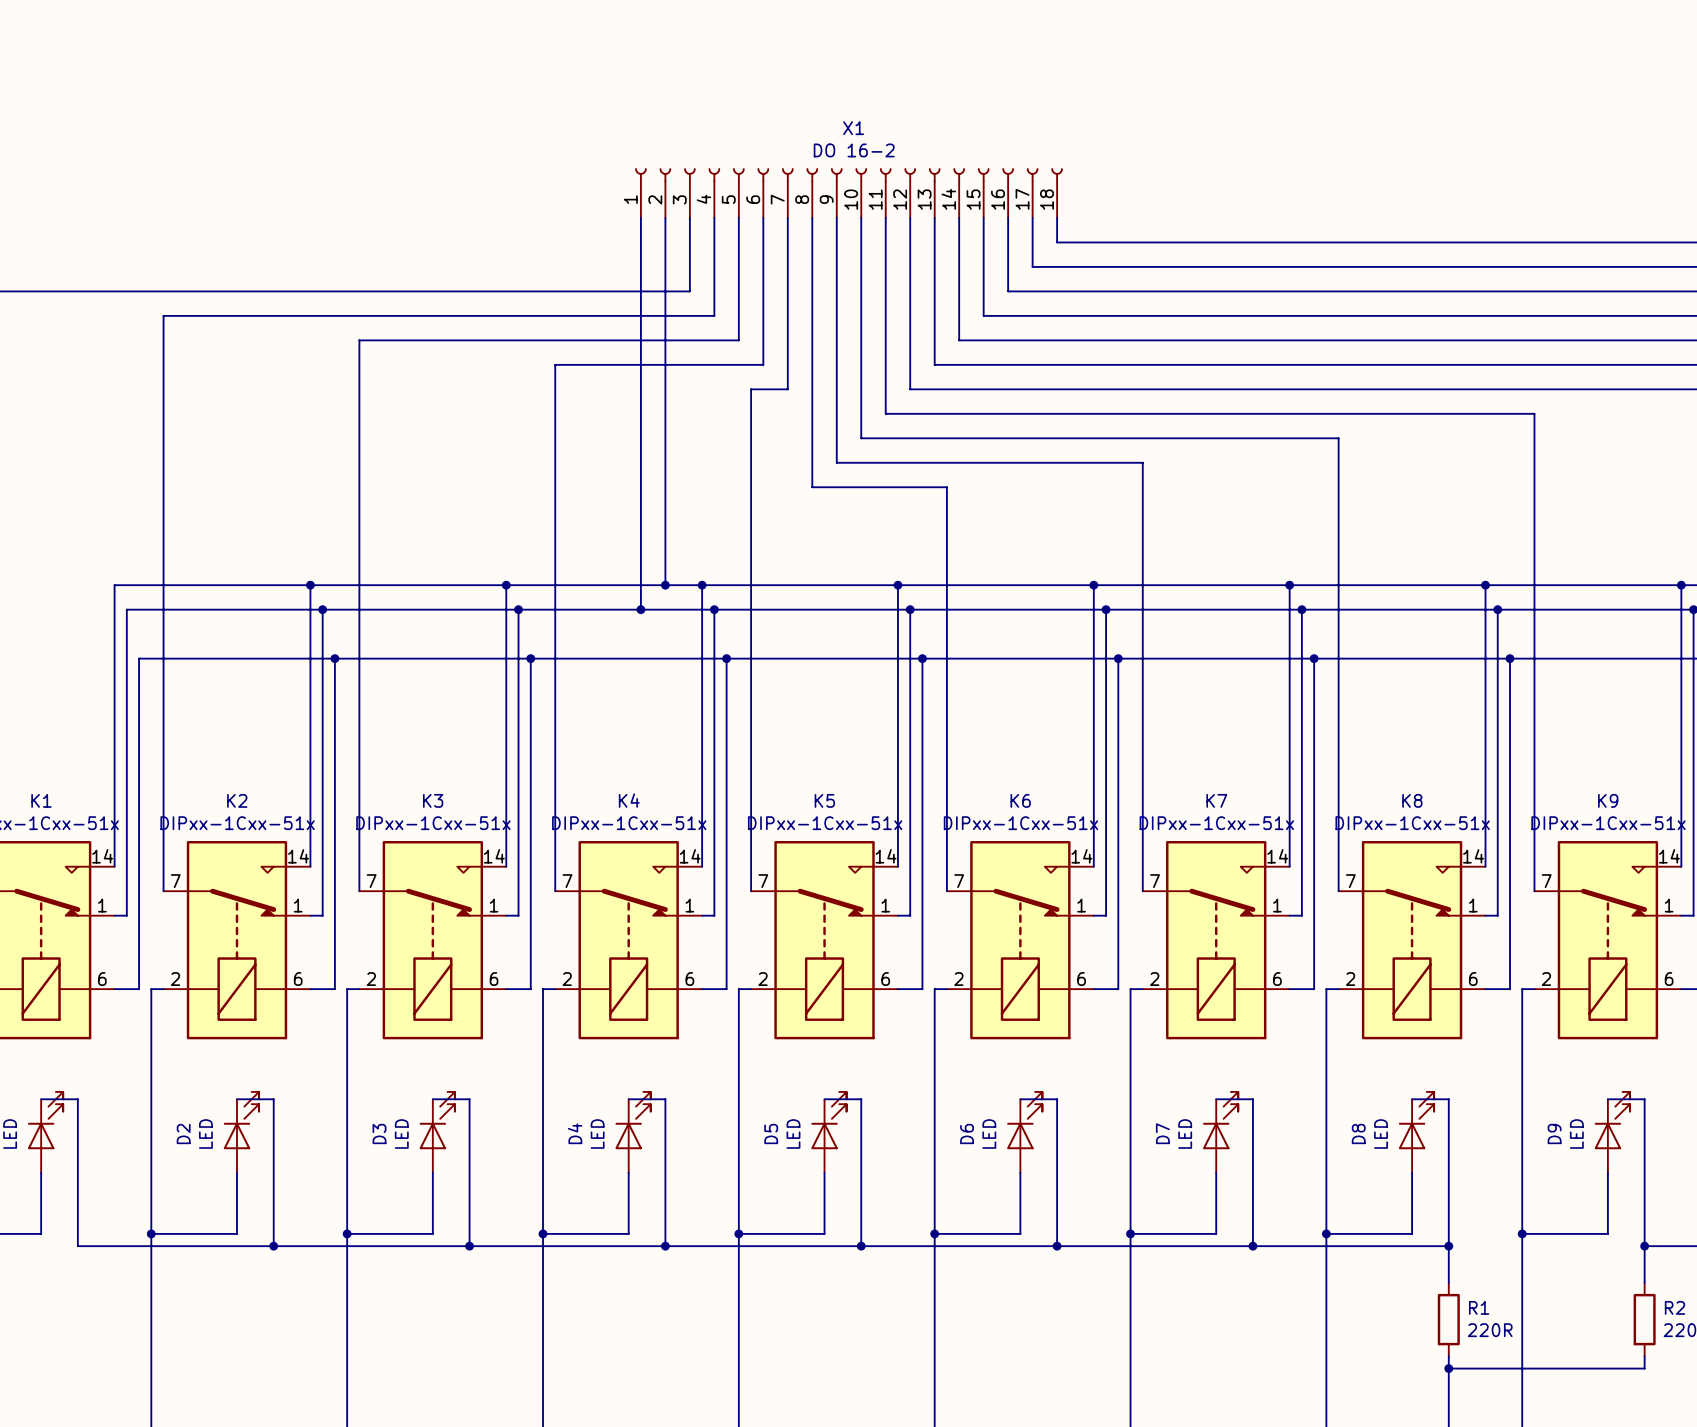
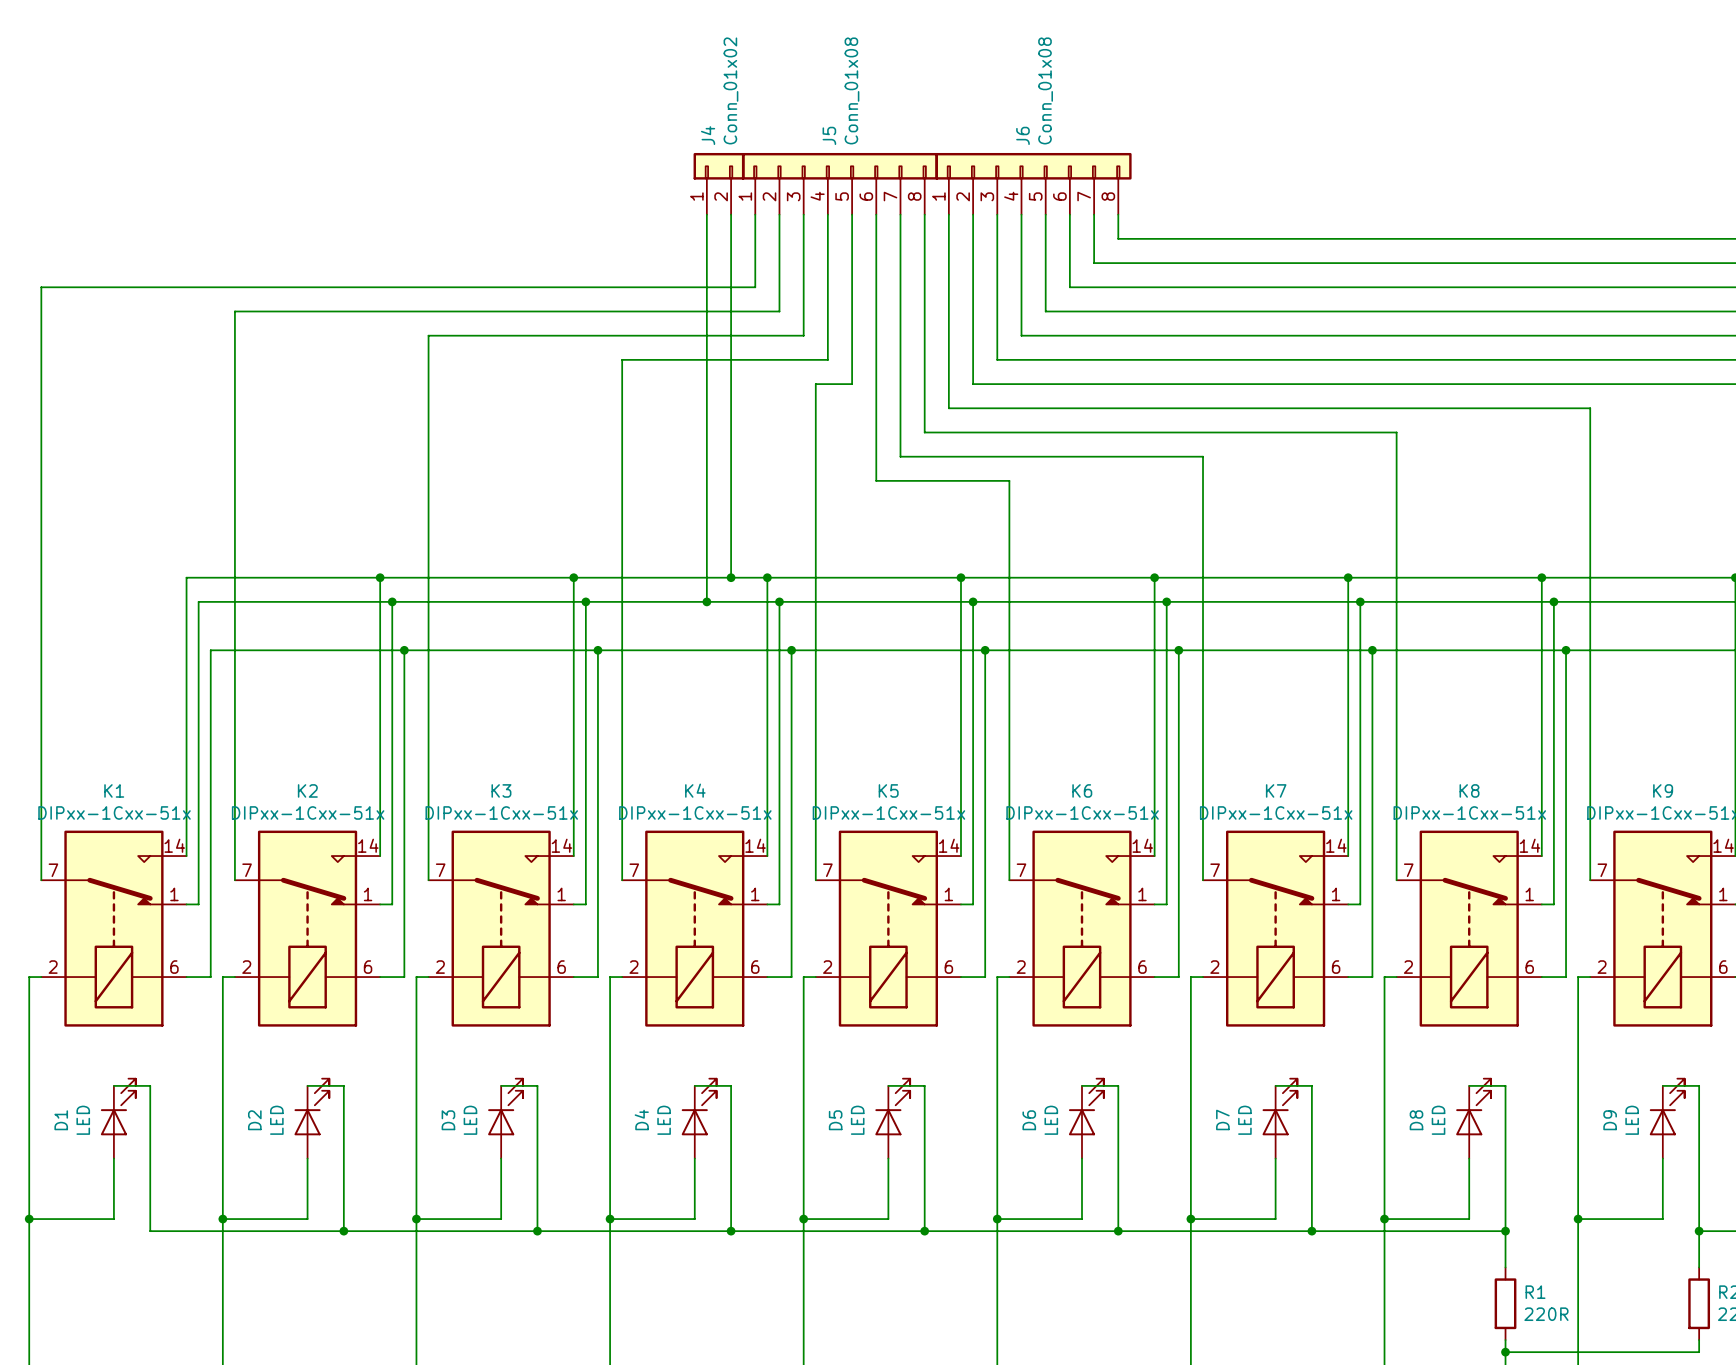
J4: none -> Conn_01x02 (718, 183)
J5: none -> Conn_01x08 (839, 183)
J6: none -> Conn_01x08 (1033, 183)
X1: DO 16-2 (849, 193) -> none

